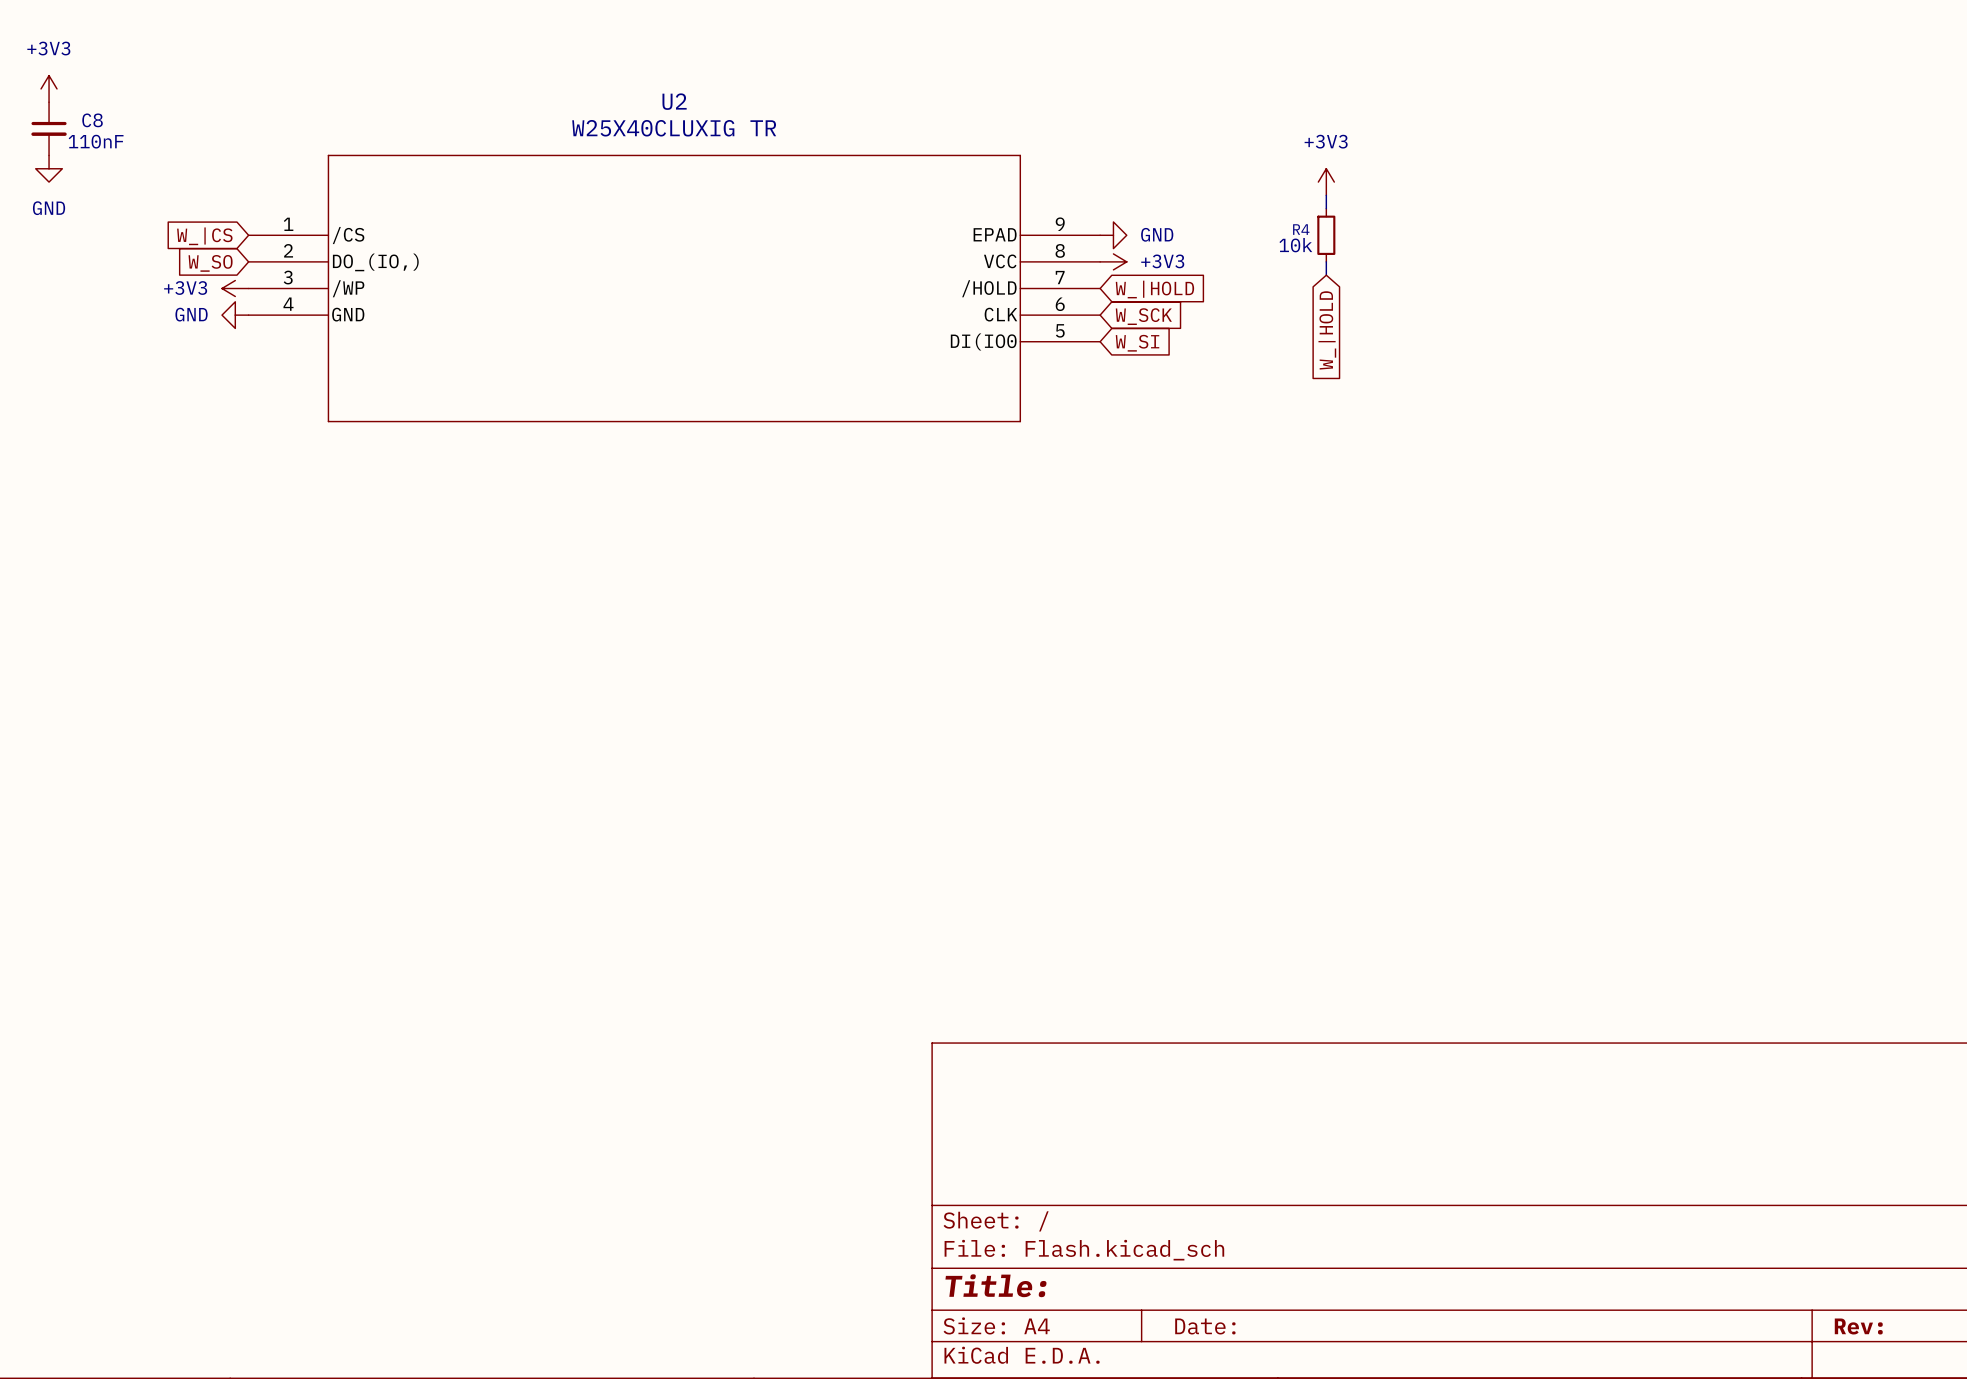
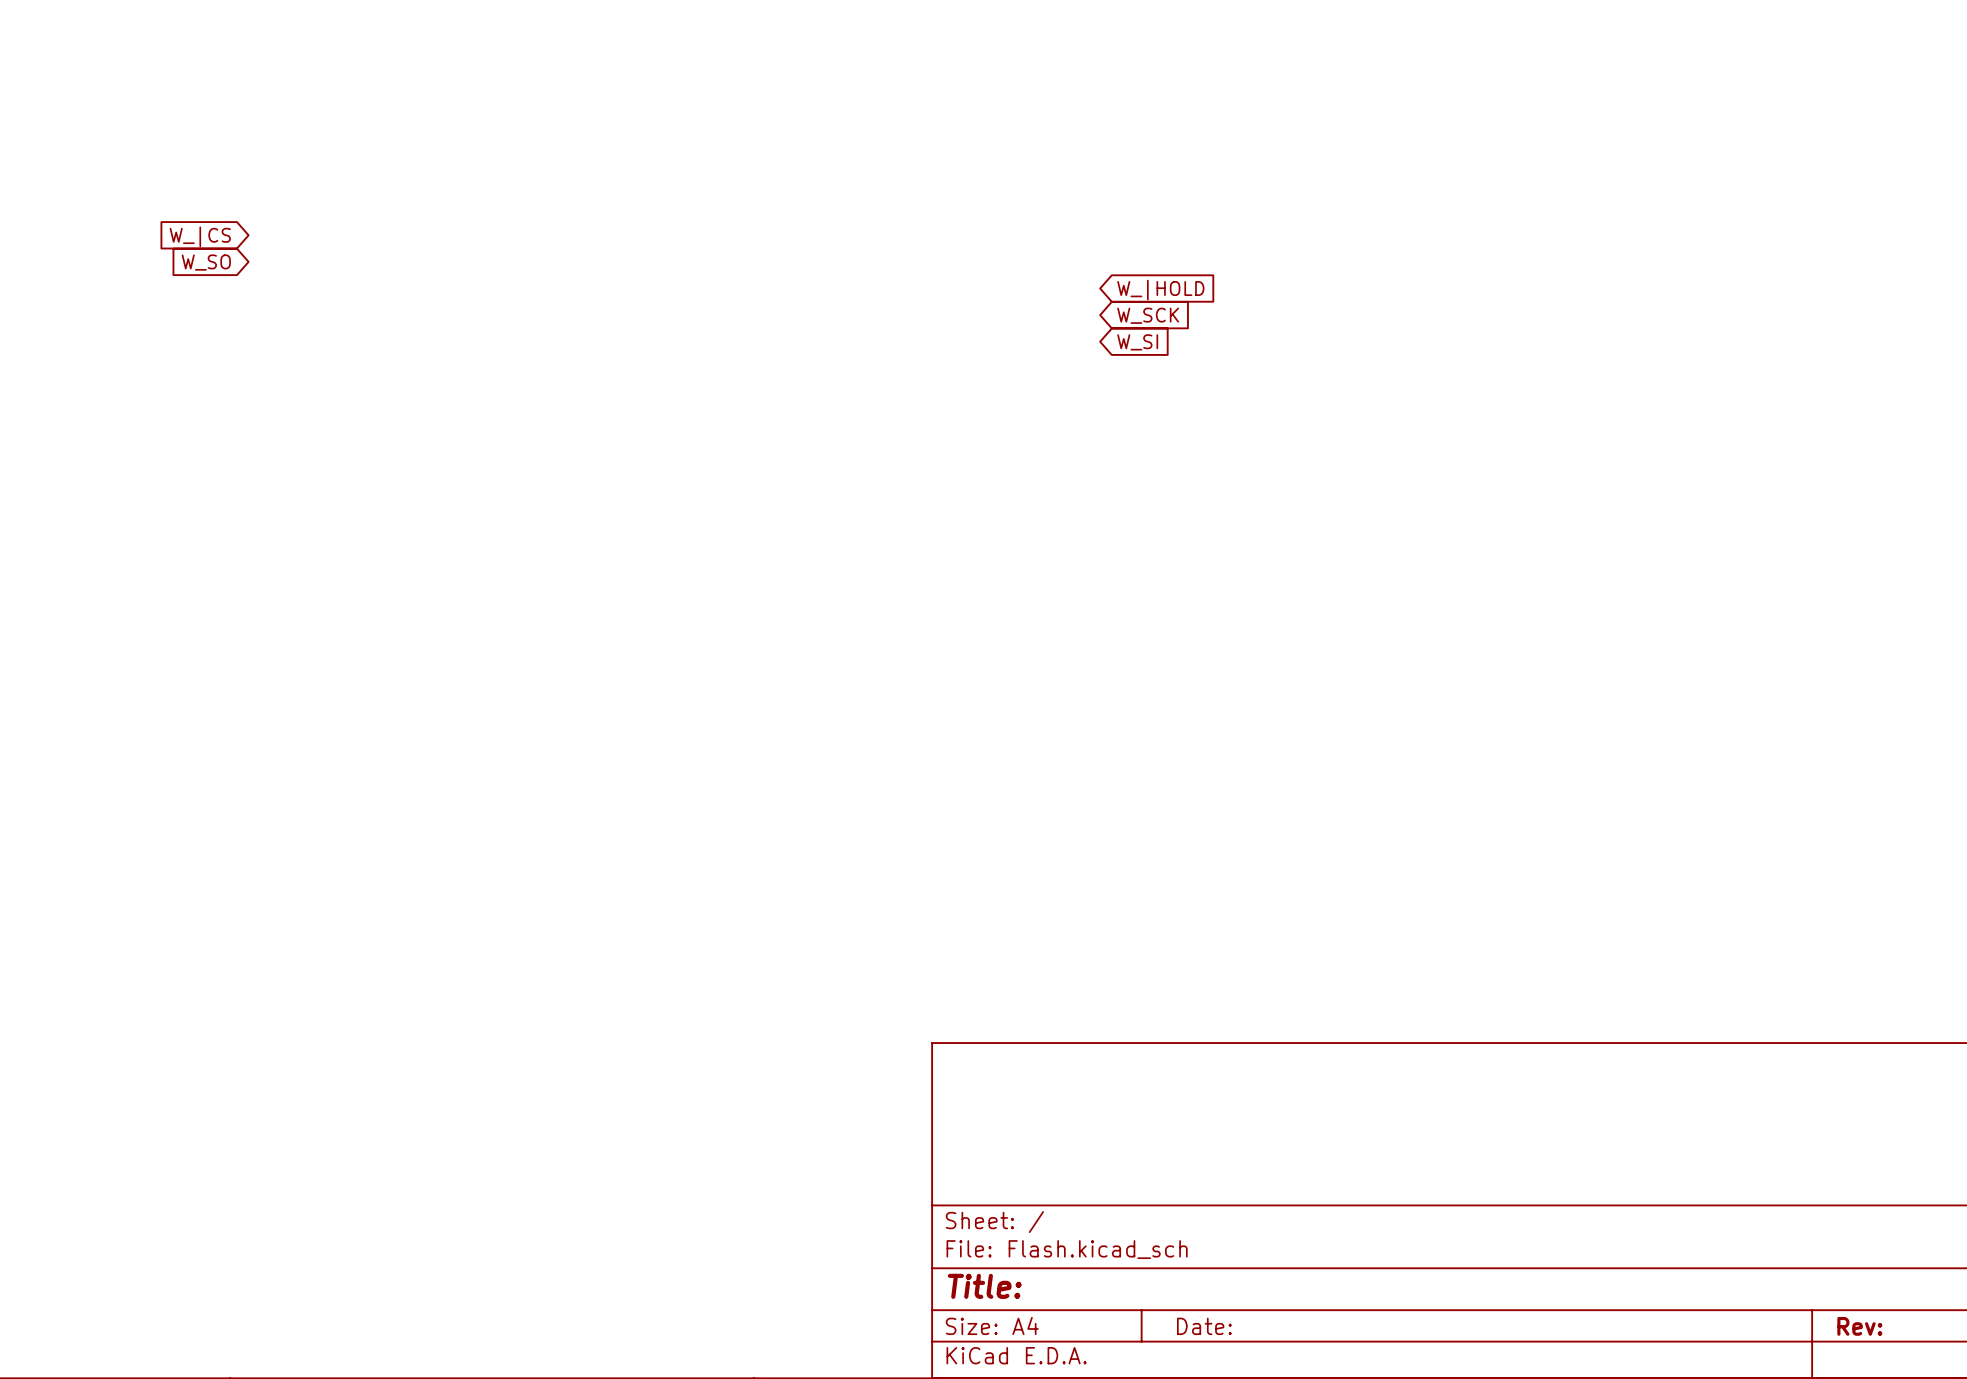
power symbol: +3V3 (49, 88) -> none
C8: 110nF (49, 128) -> none
power symbol: GND (49, 168) -> none
power symbol: +3V3 (1326, 182) -> none
wire: (1326, 195) (1326, 208) -> none
power symbol: GND (1113, 235) -> none
R4: 10k (1326, 235) -> none
power symbol: +3V3 (1113, 261) -> none
wire: (1326, 261) (1326, 275) -> none
power symbol: +3V3 (235, 288) -> none
U2: W25X40CLUXIG TR (674, 288) -> none
power symbol: GND (235, 315) -> none
global label: W_|HOLD (1327, 330) -> none

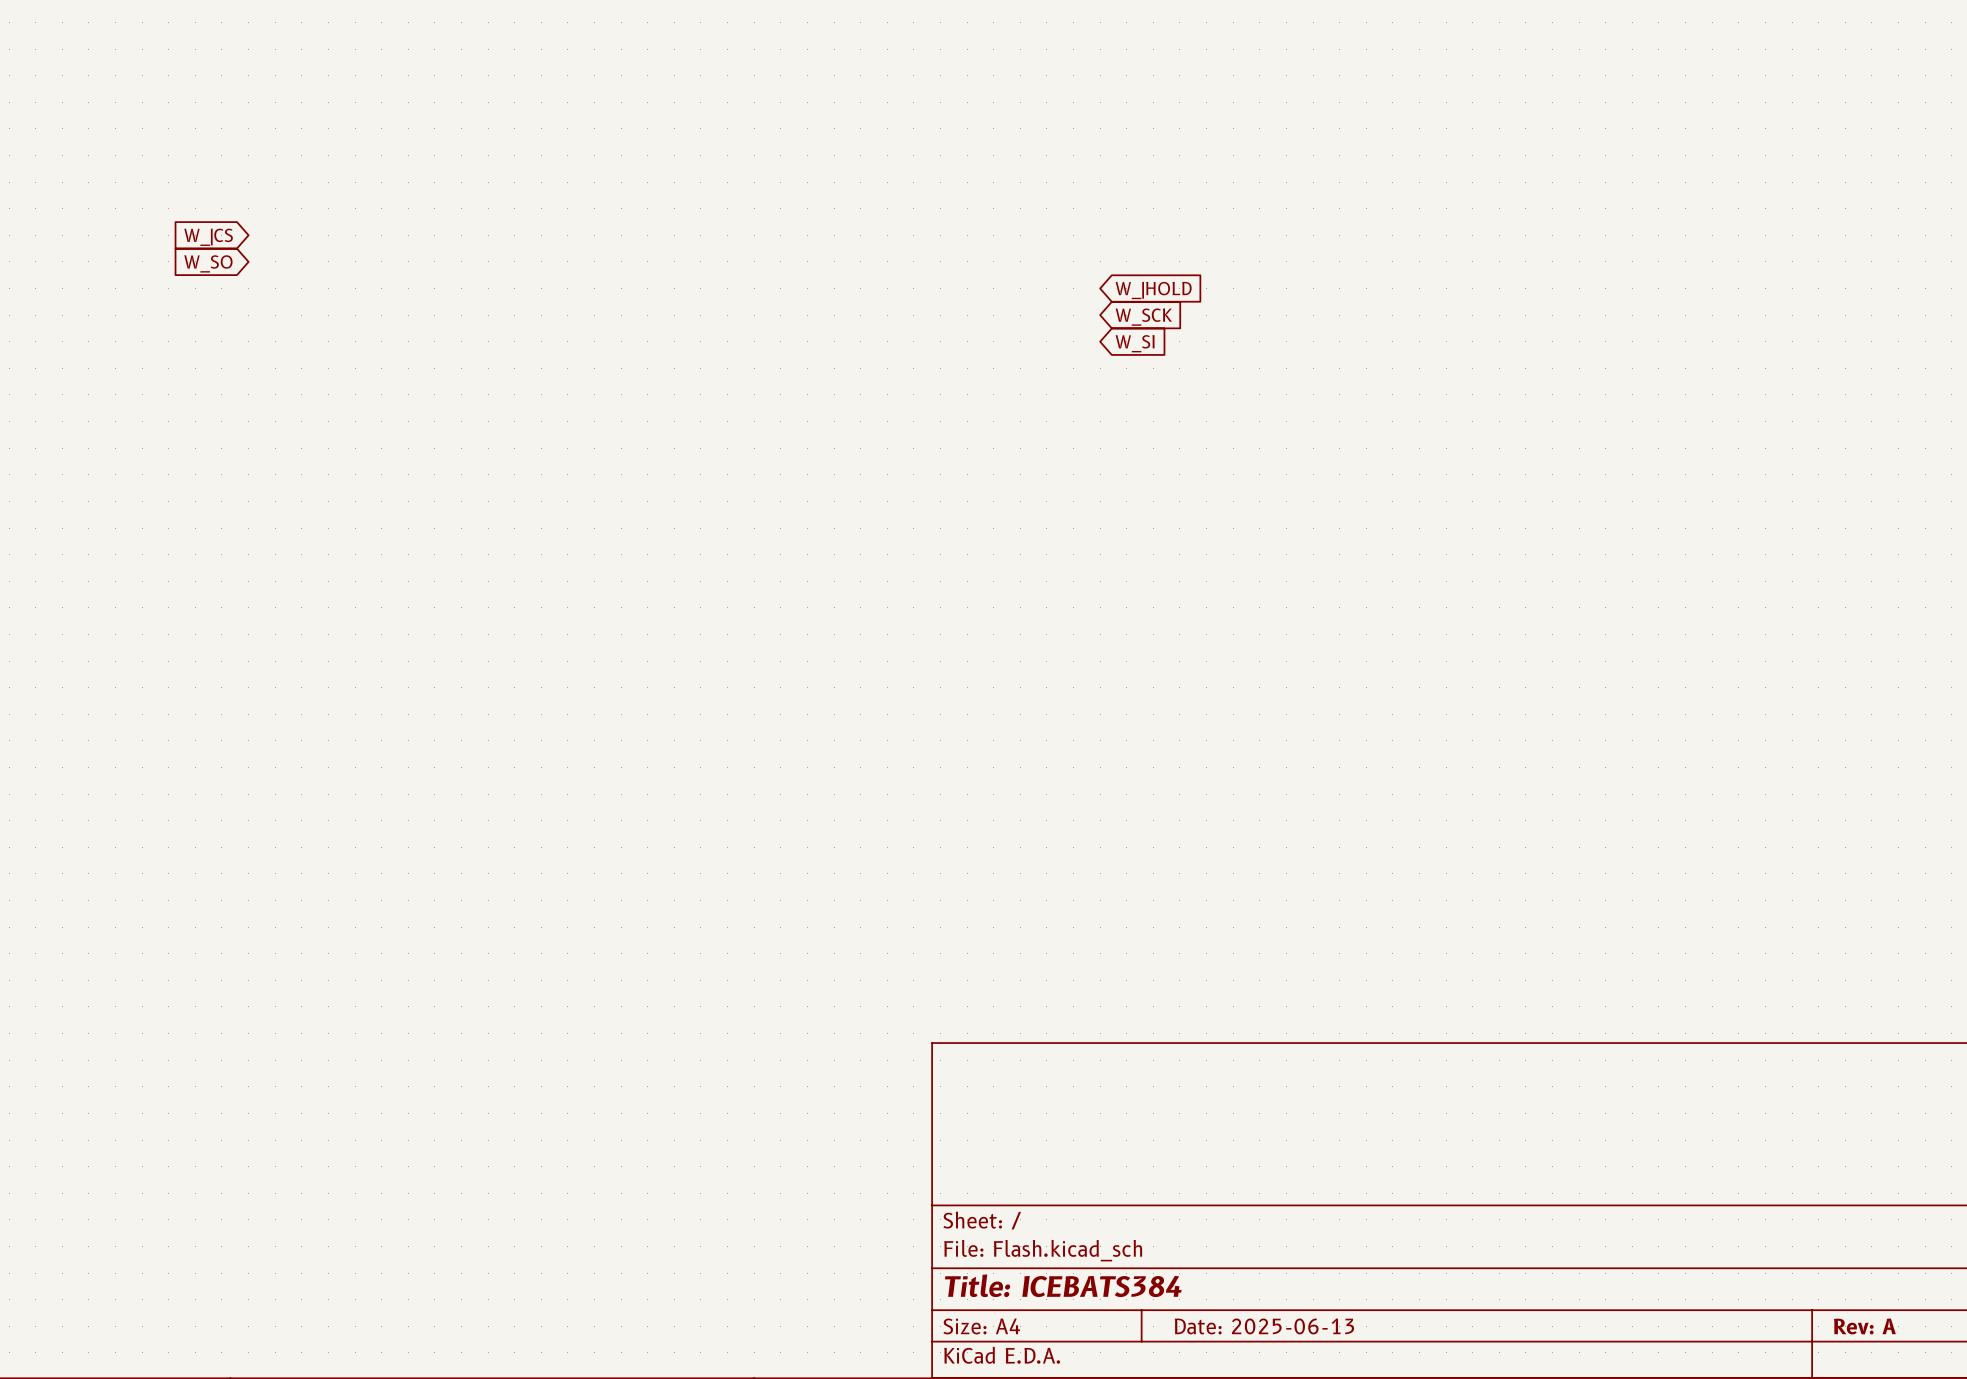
title block: Title: (984, 1286) -> Title: ICEBATS384 (1063, 1285)
title block: Date: (1204, 1326) -> Date: 2025-06-13 (1264, 1326)
title block: Rev: (1859, 1326) -> Rev: A (1864, 1326)

